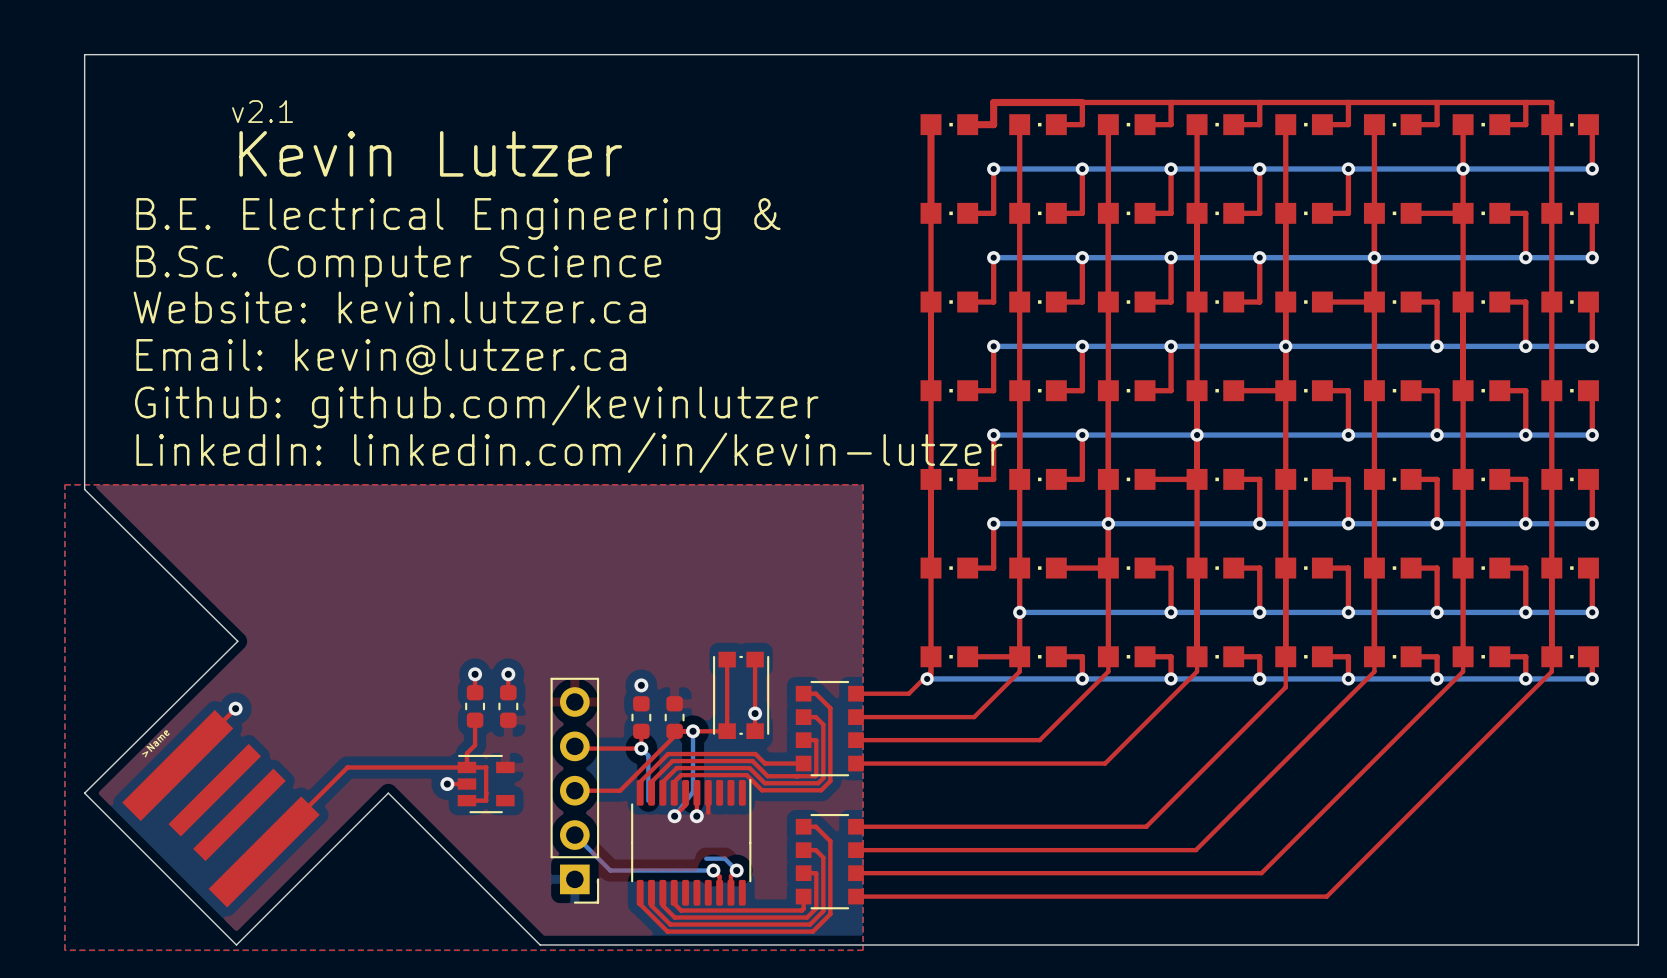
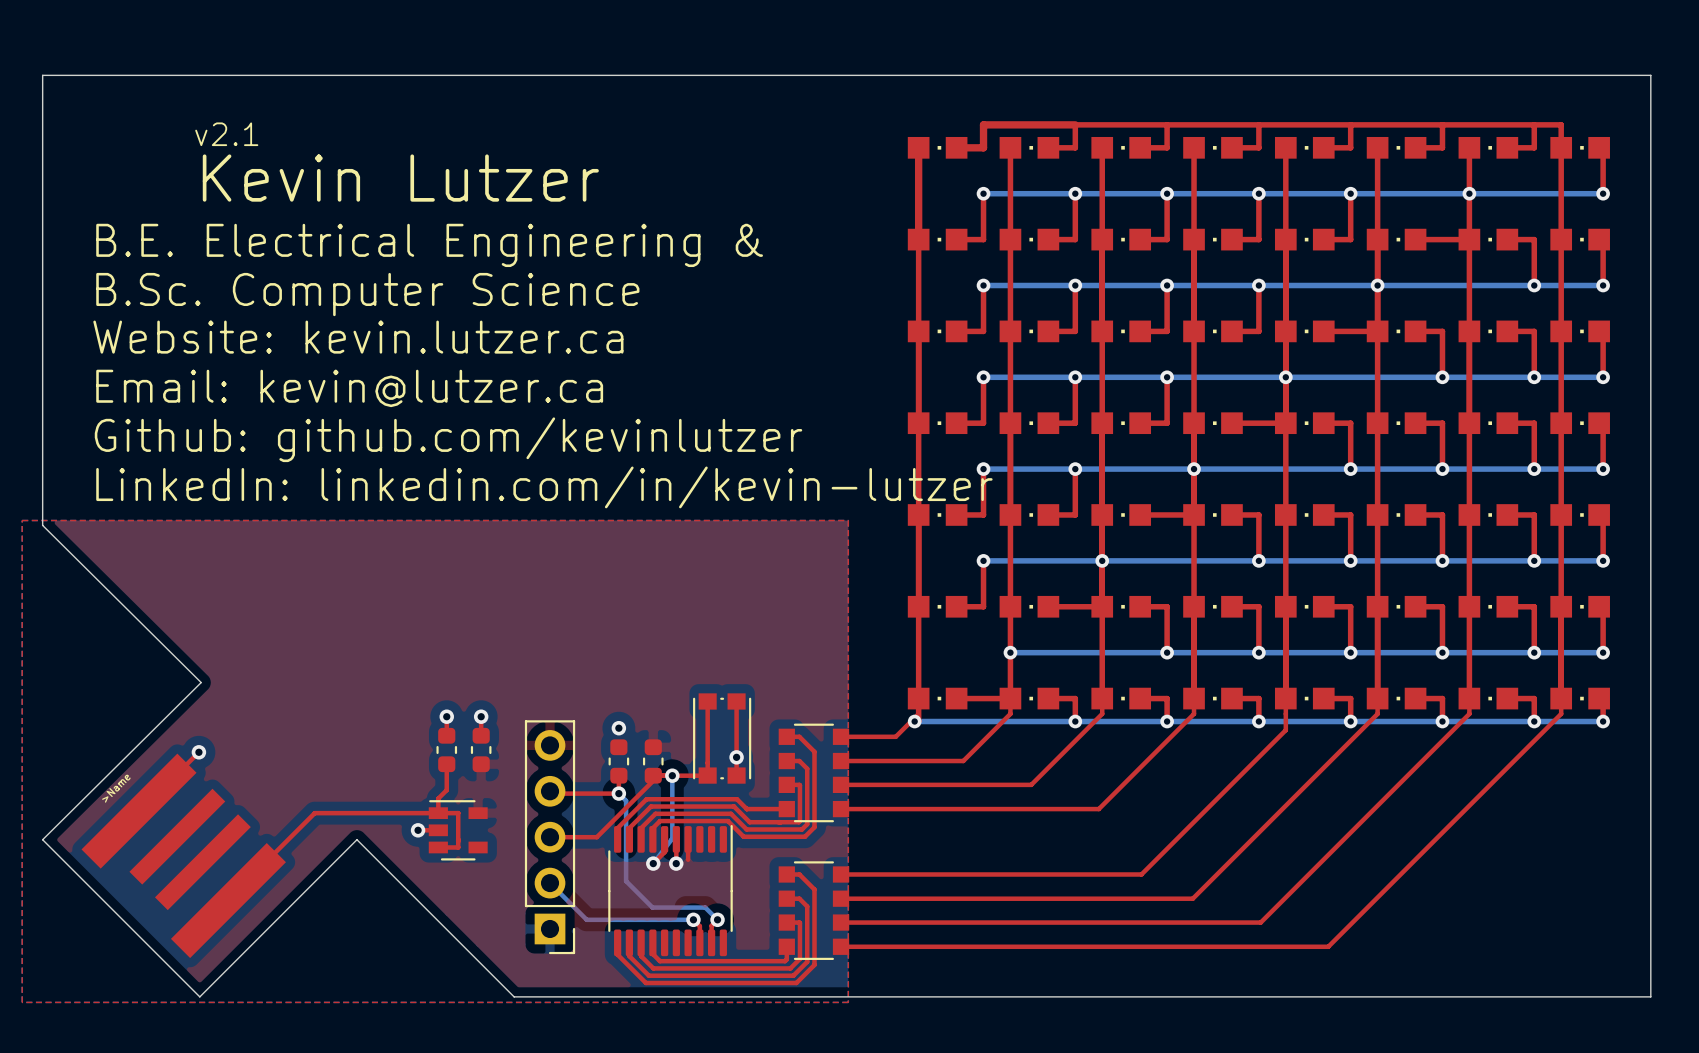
bottom track: none -> (626, 847) (626, 881) (652, 907) (686, 907)

